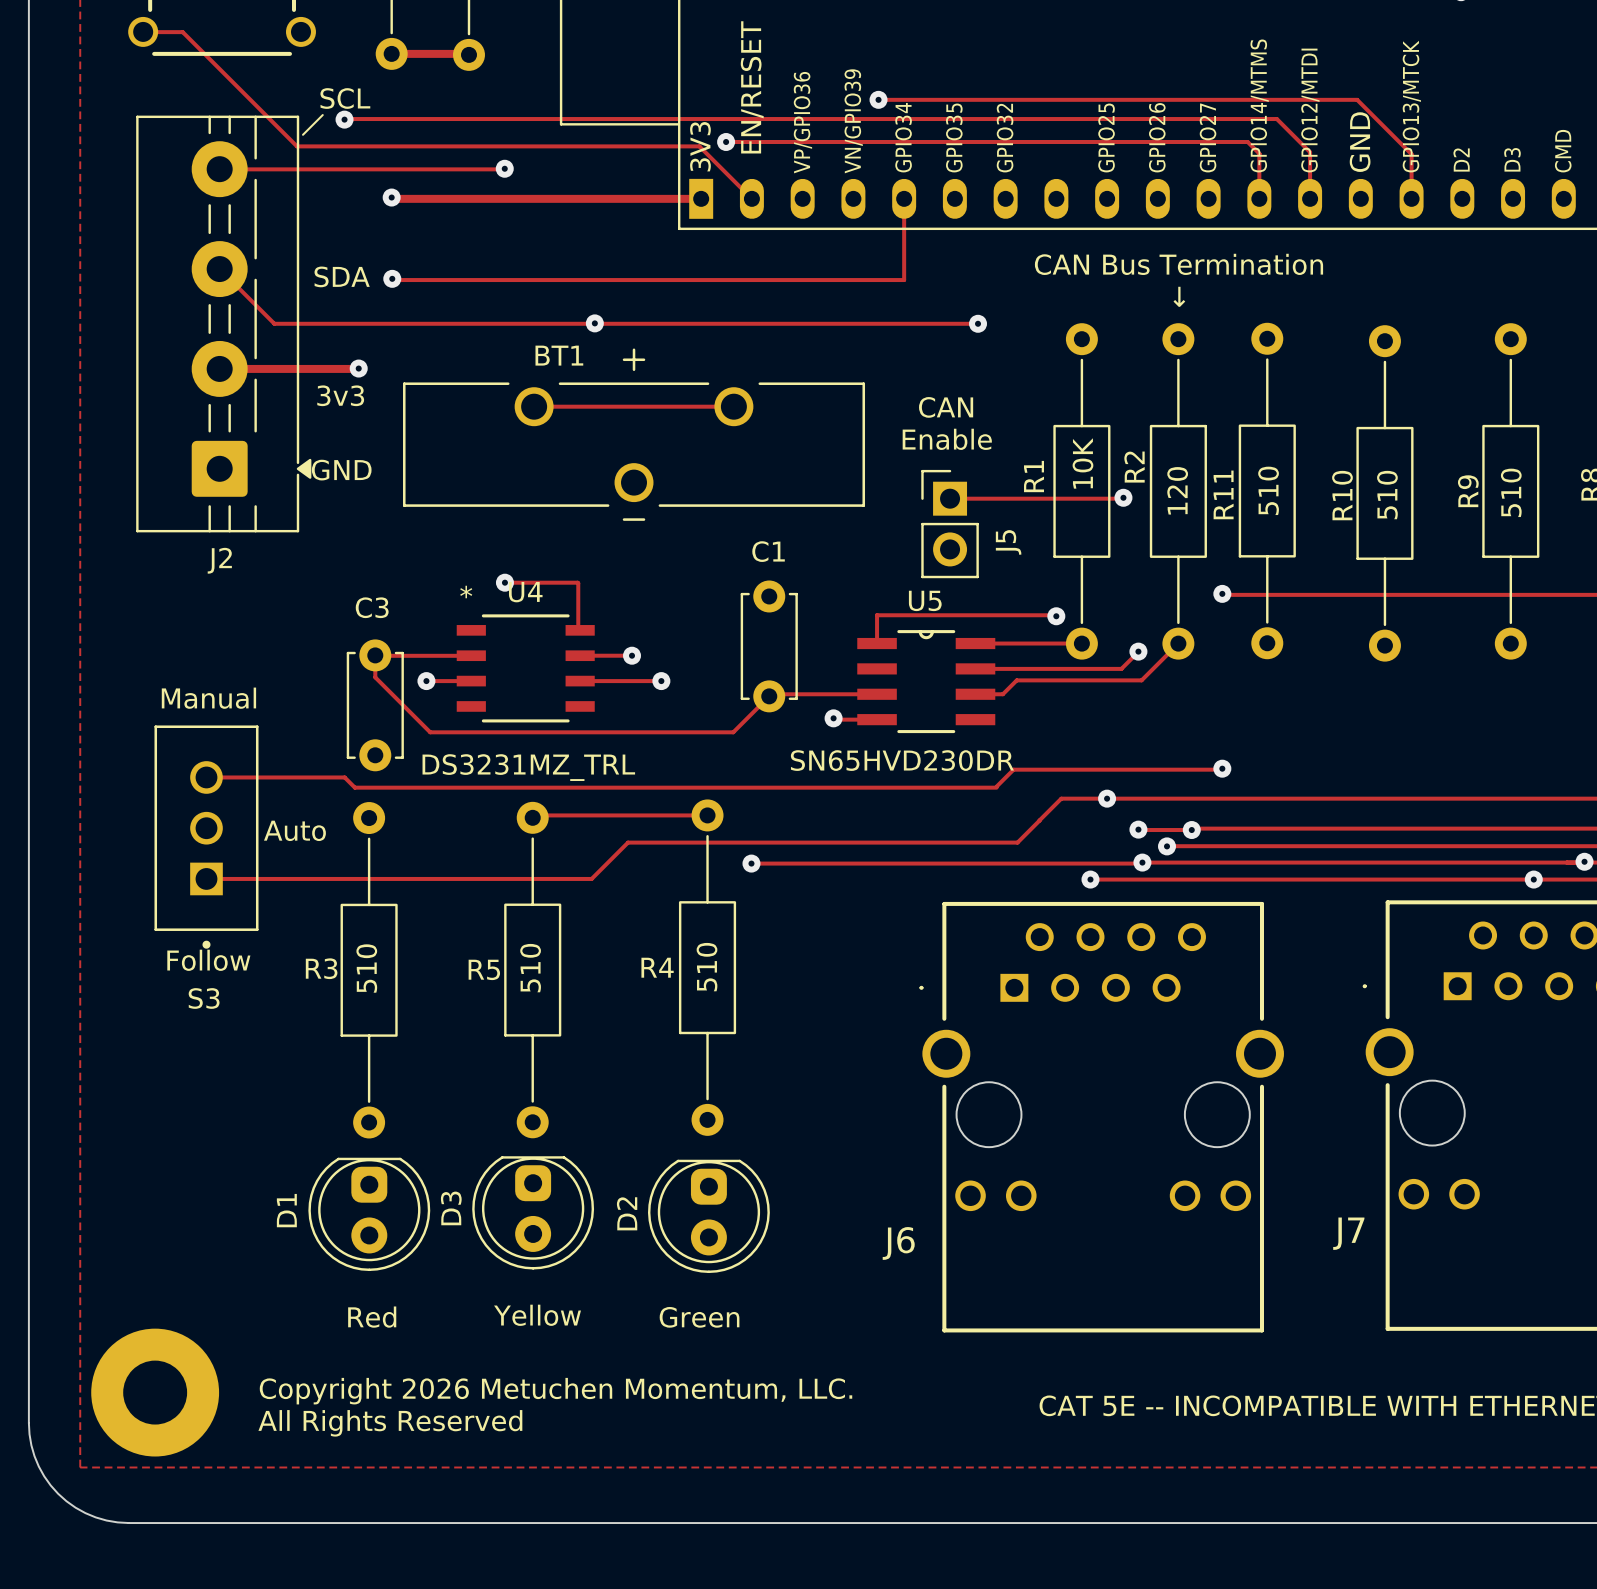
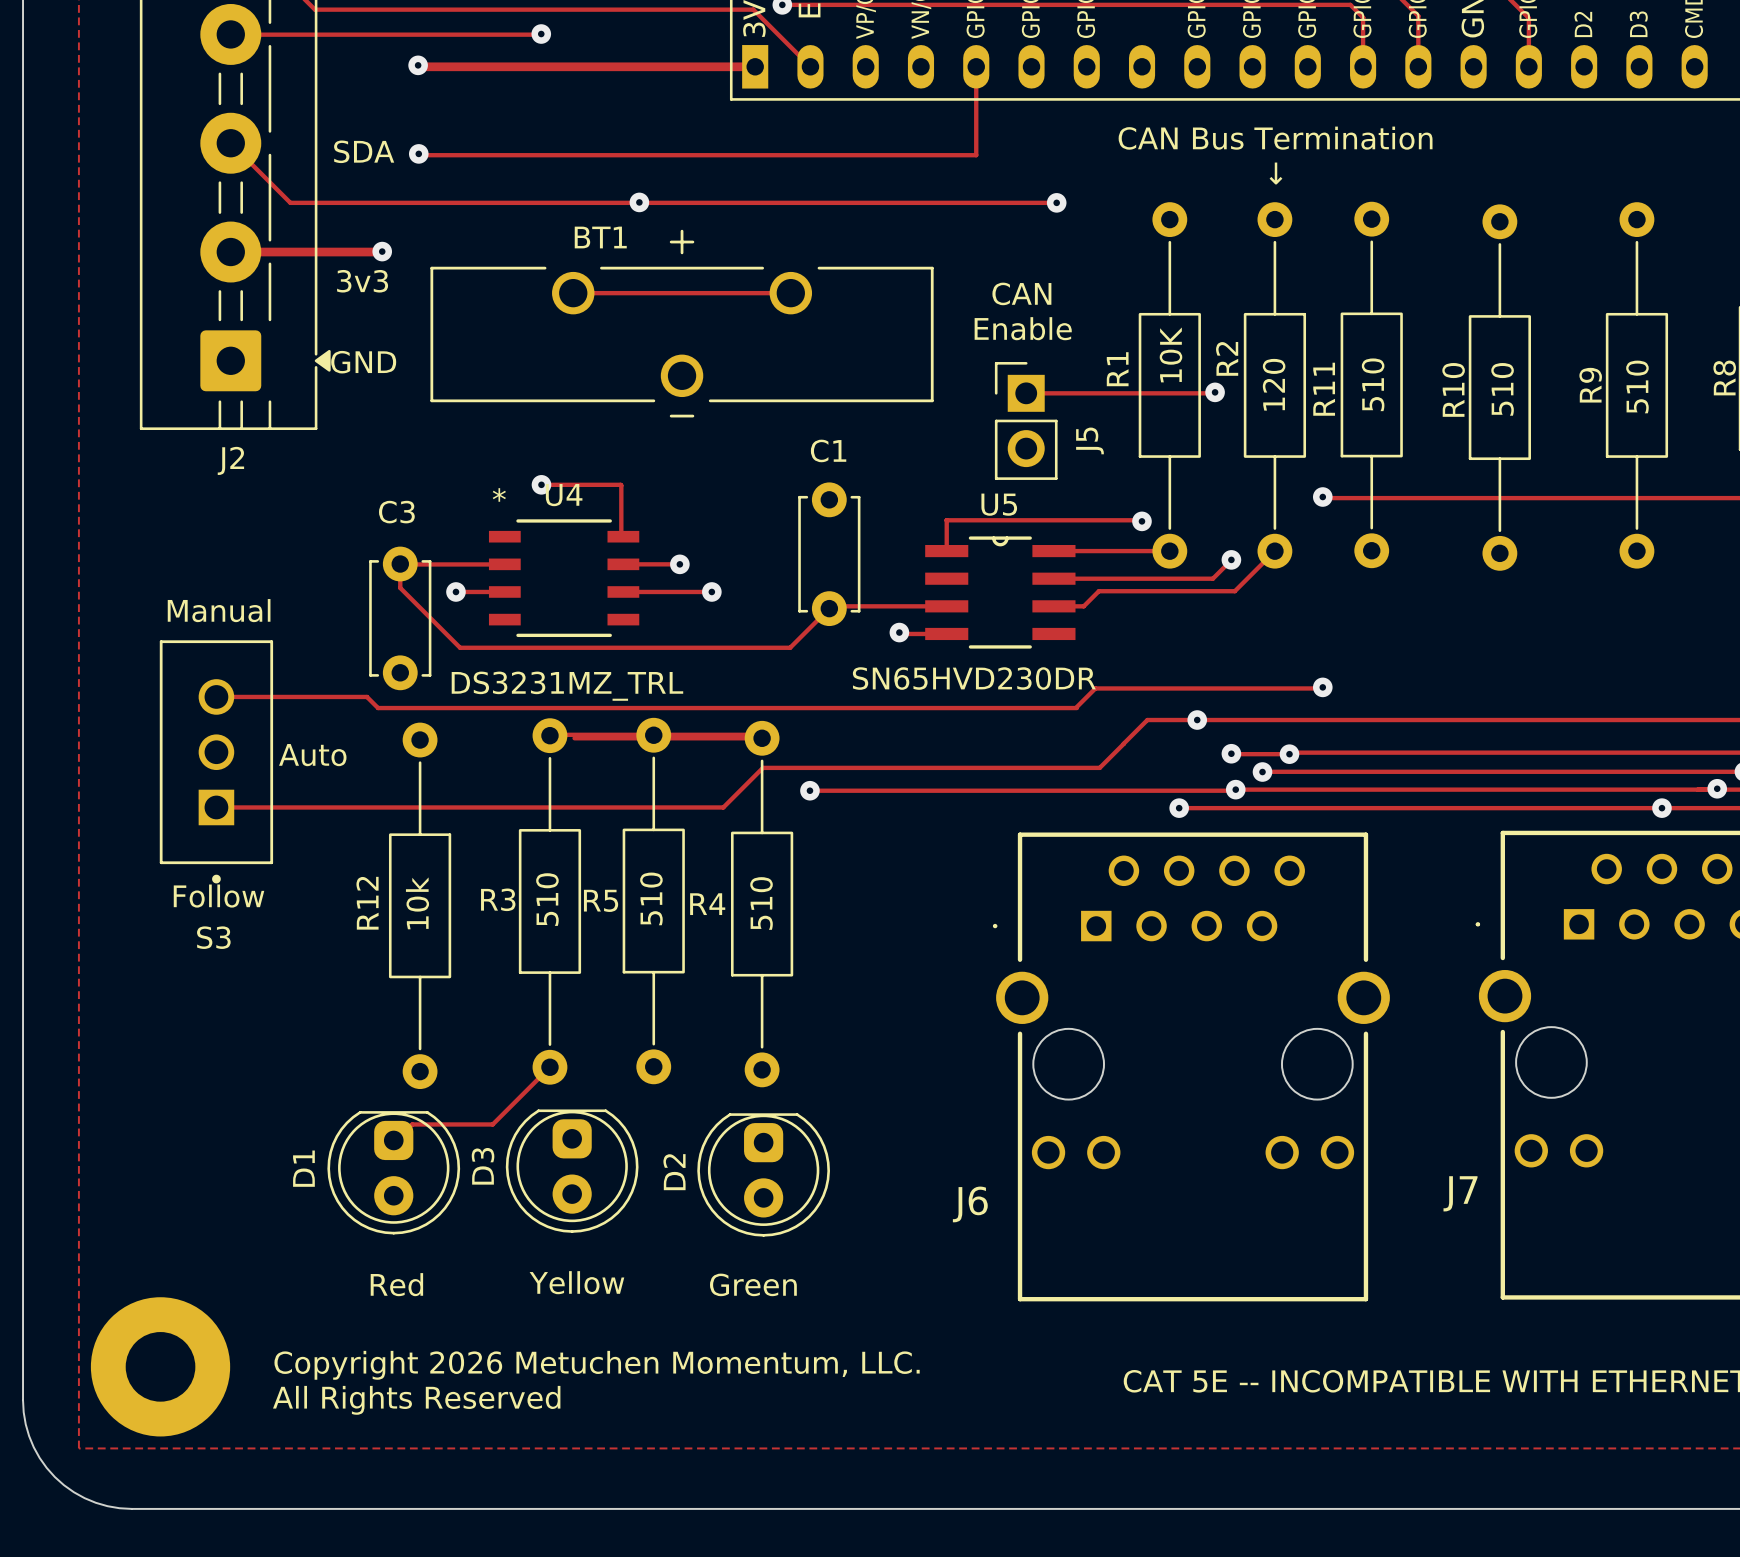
track: none -> (558, 734) (768, 734)
track: (708, 842) (628, 842) (591, 878) -> (762, 767) (723, 807) (635, 807)
R12: none -> 10k (420, 905)
R3 position: (369, 970) -> (549, 901)
R5 position: (532, 970) -> (653, 901)
track: none -> (549, 1067) (492, 1124) (412, 1124) (396, 1140)

